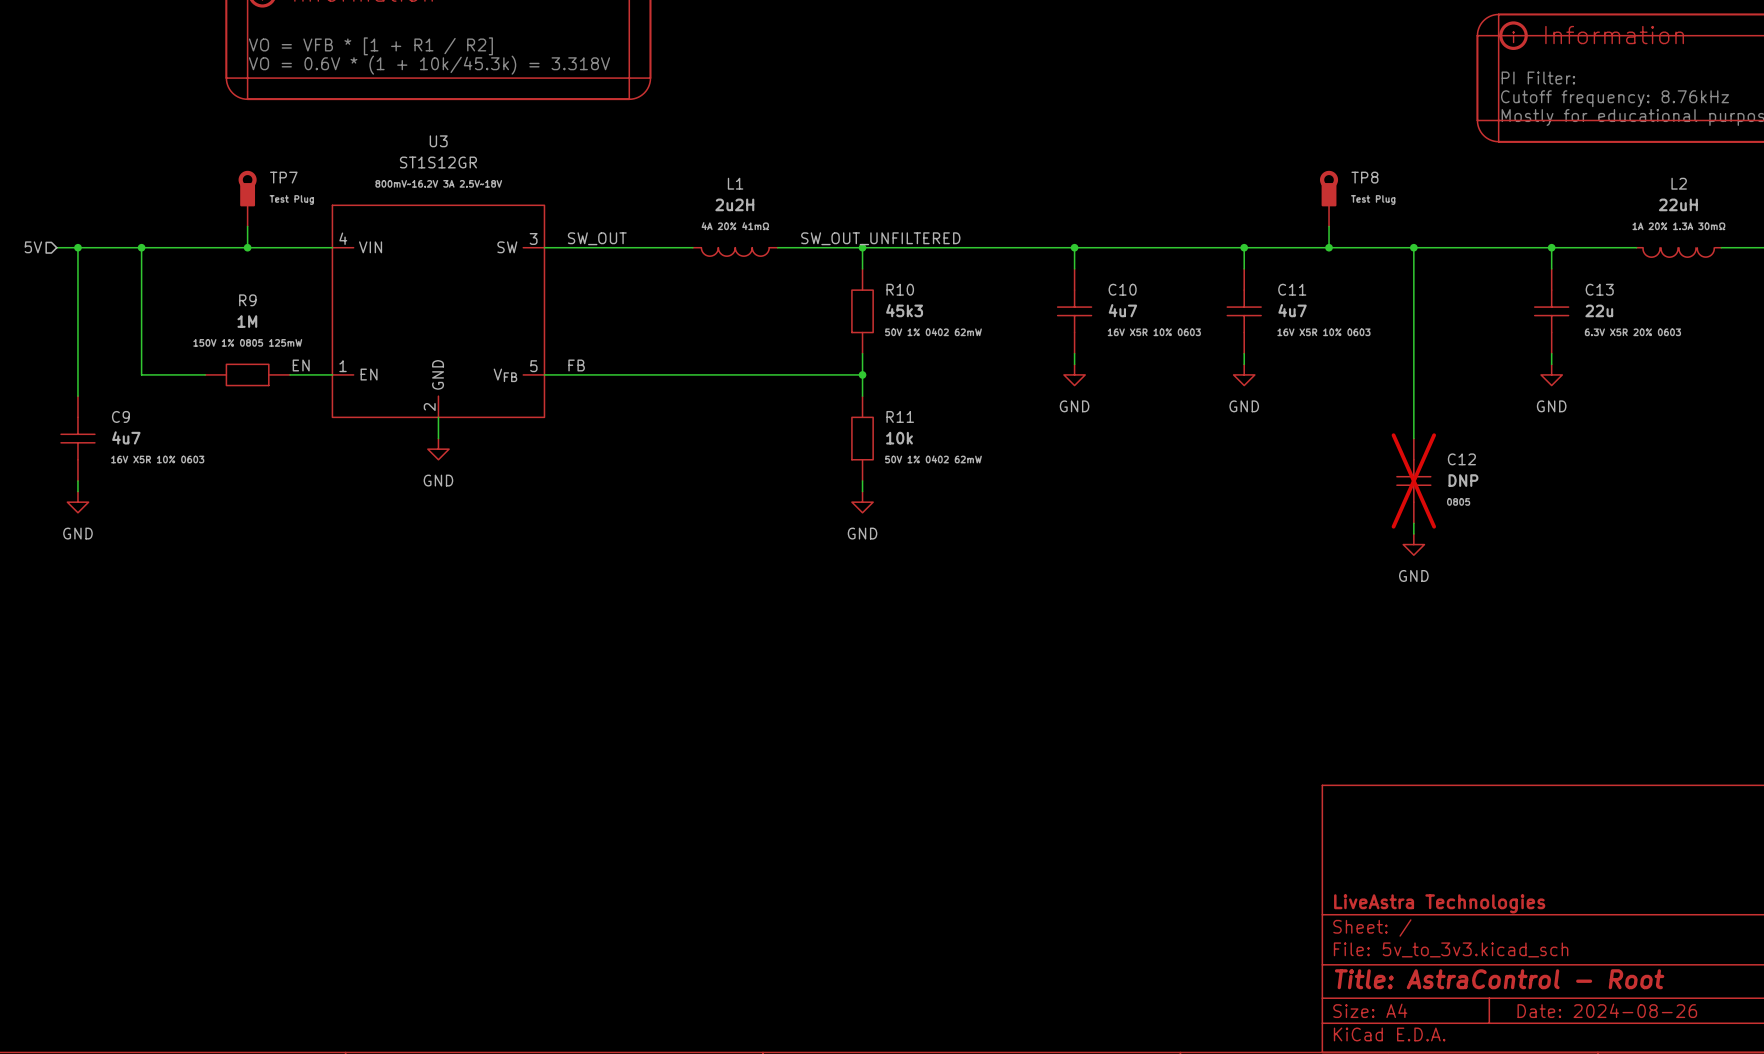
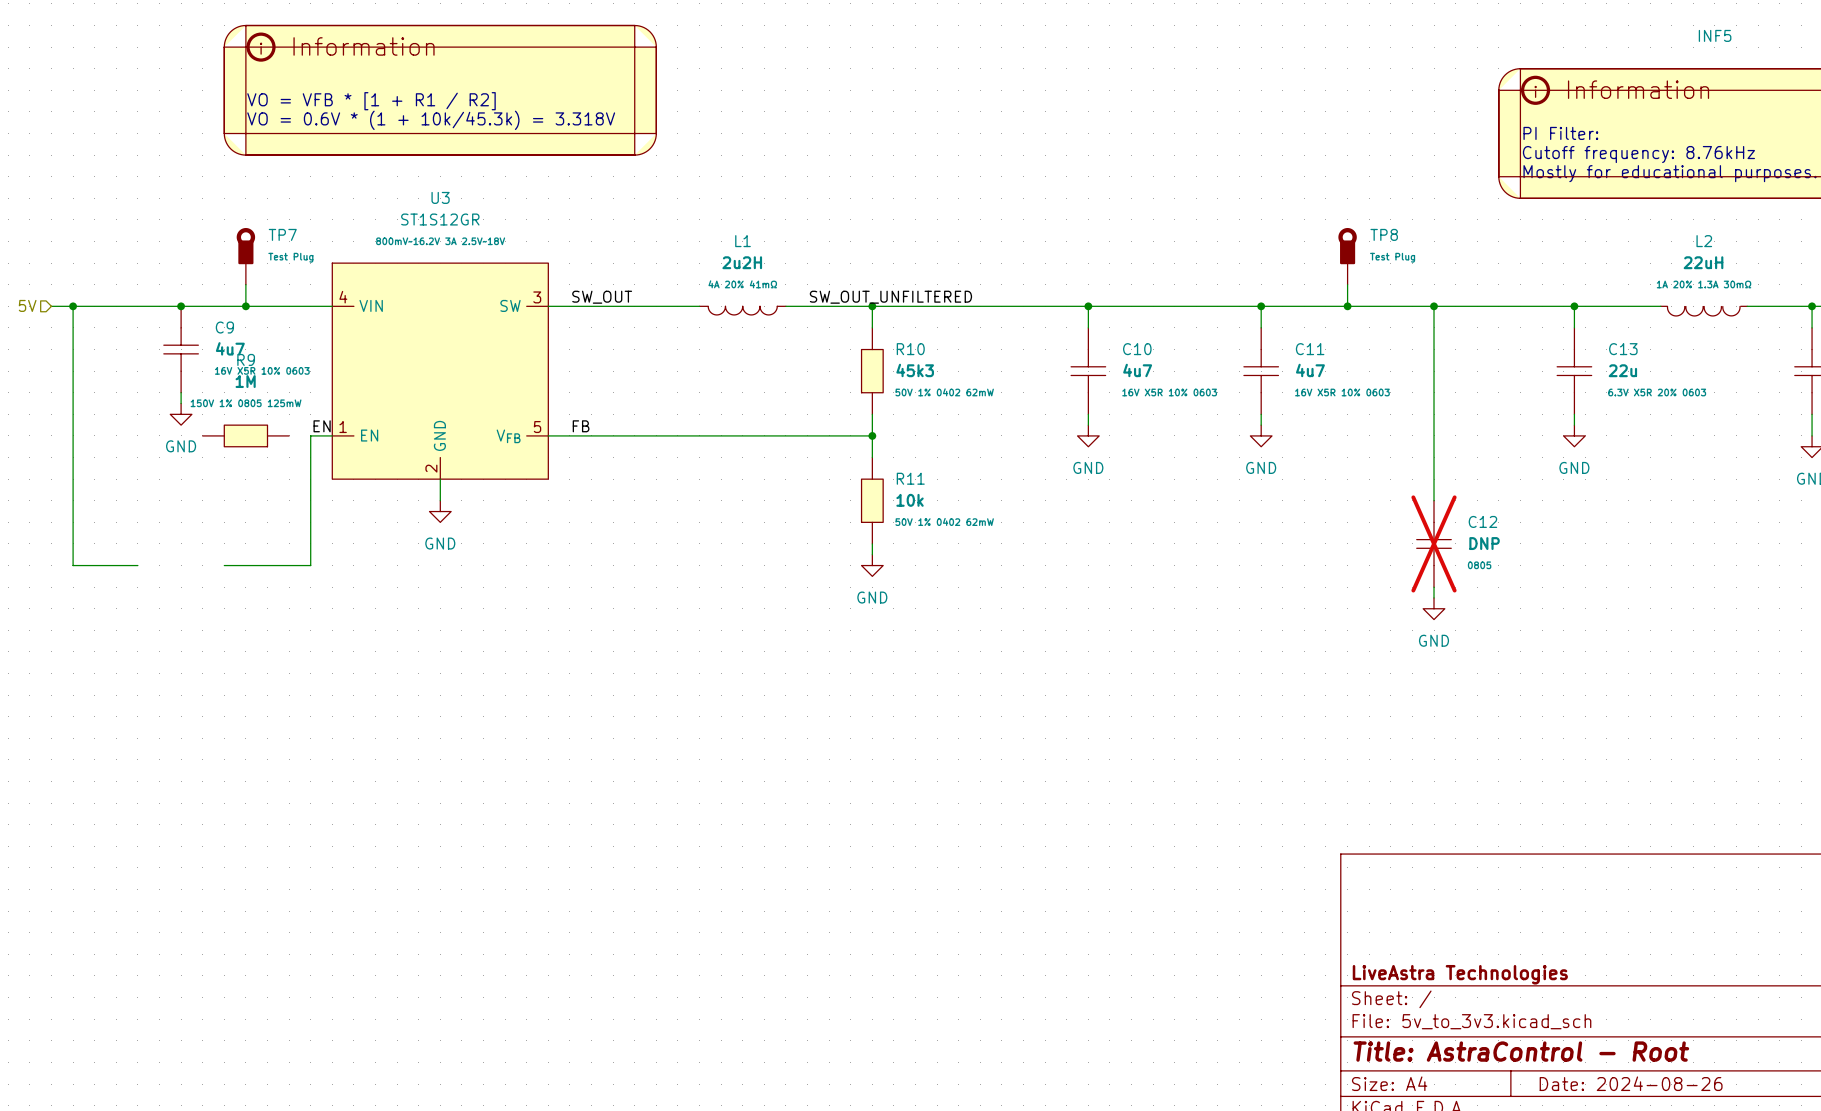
wire: (141, 247) (141, 374) (205, 374) -> none
junction position: (141, 247) -> (181, 306)
wire: none -> (181, 392) (181, 403)
label position: EN (301, 365) -> EN (322, 426)
wire: (290, 374) (311, 374) -> (224, 565) (310, 565) (310, 435)
C9 position: (77, 438) -> (181, 349)
wire: none -> (73, 554) (73, 565) (137, 565)
power symbol position: GND (77, 502) -> GND (181, 414)

